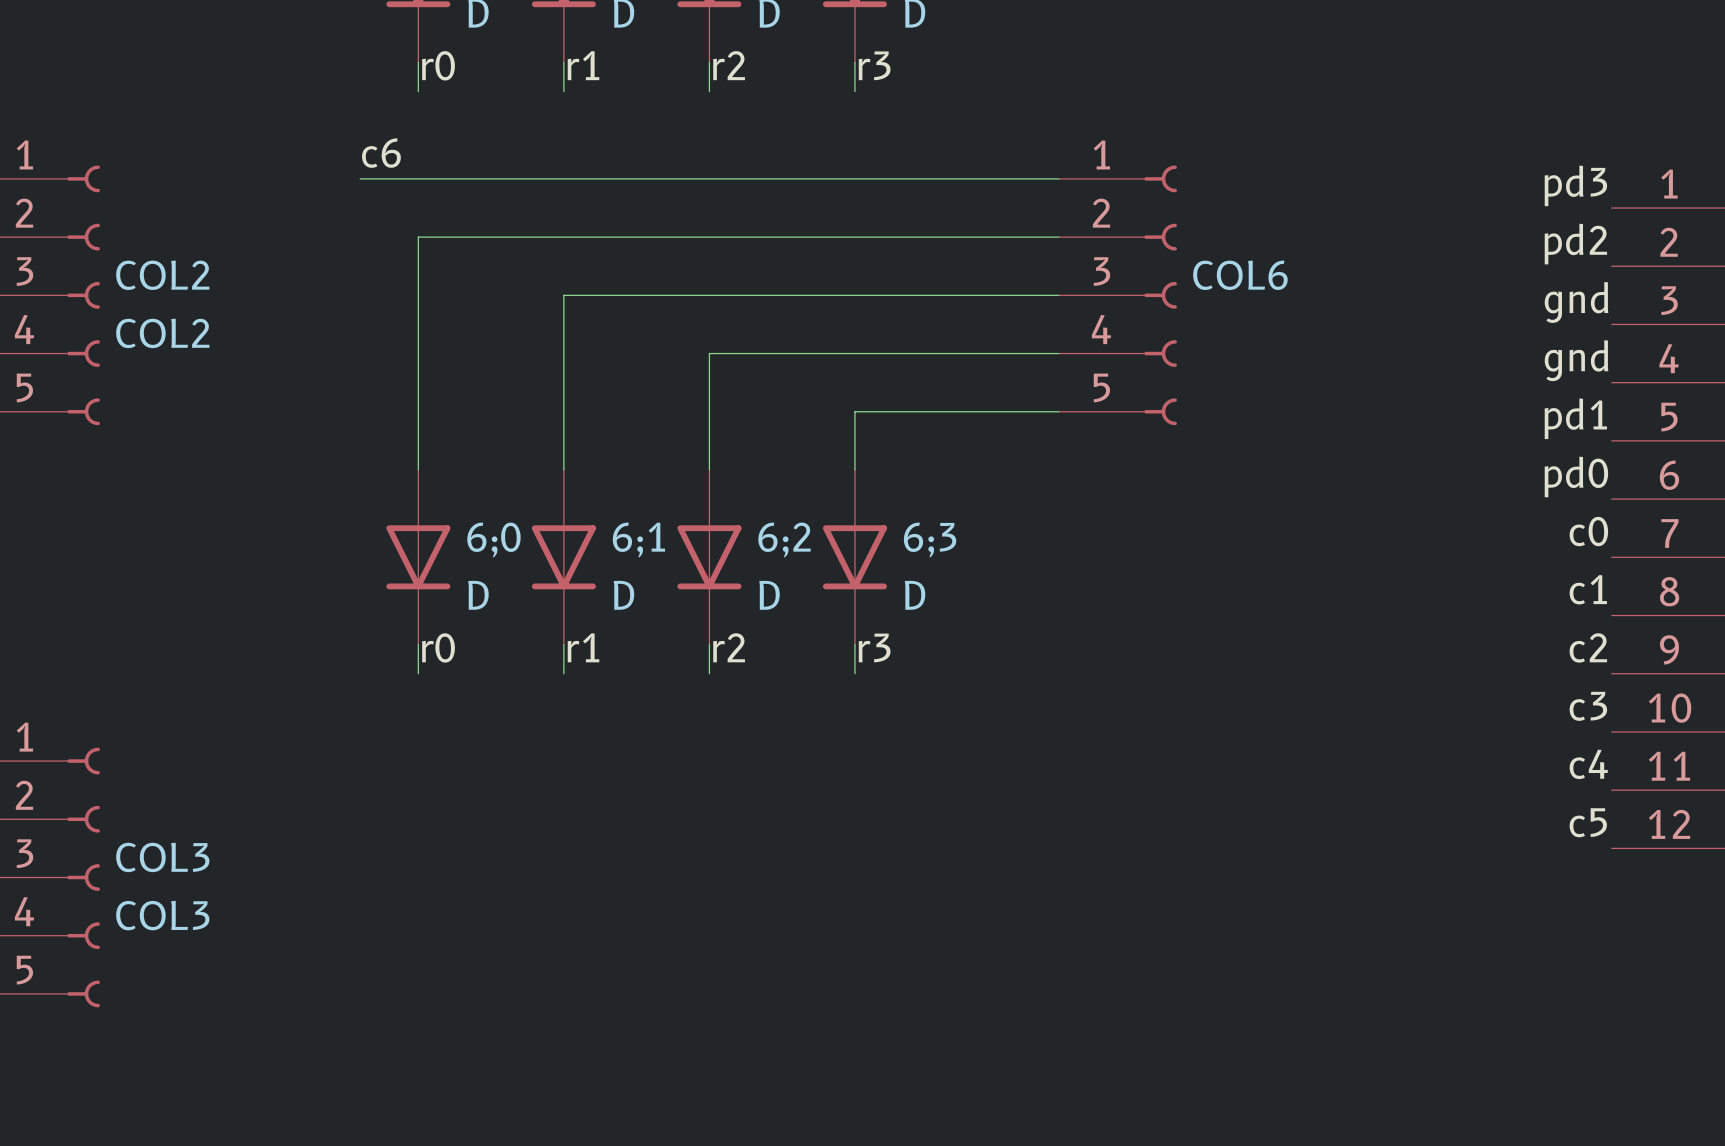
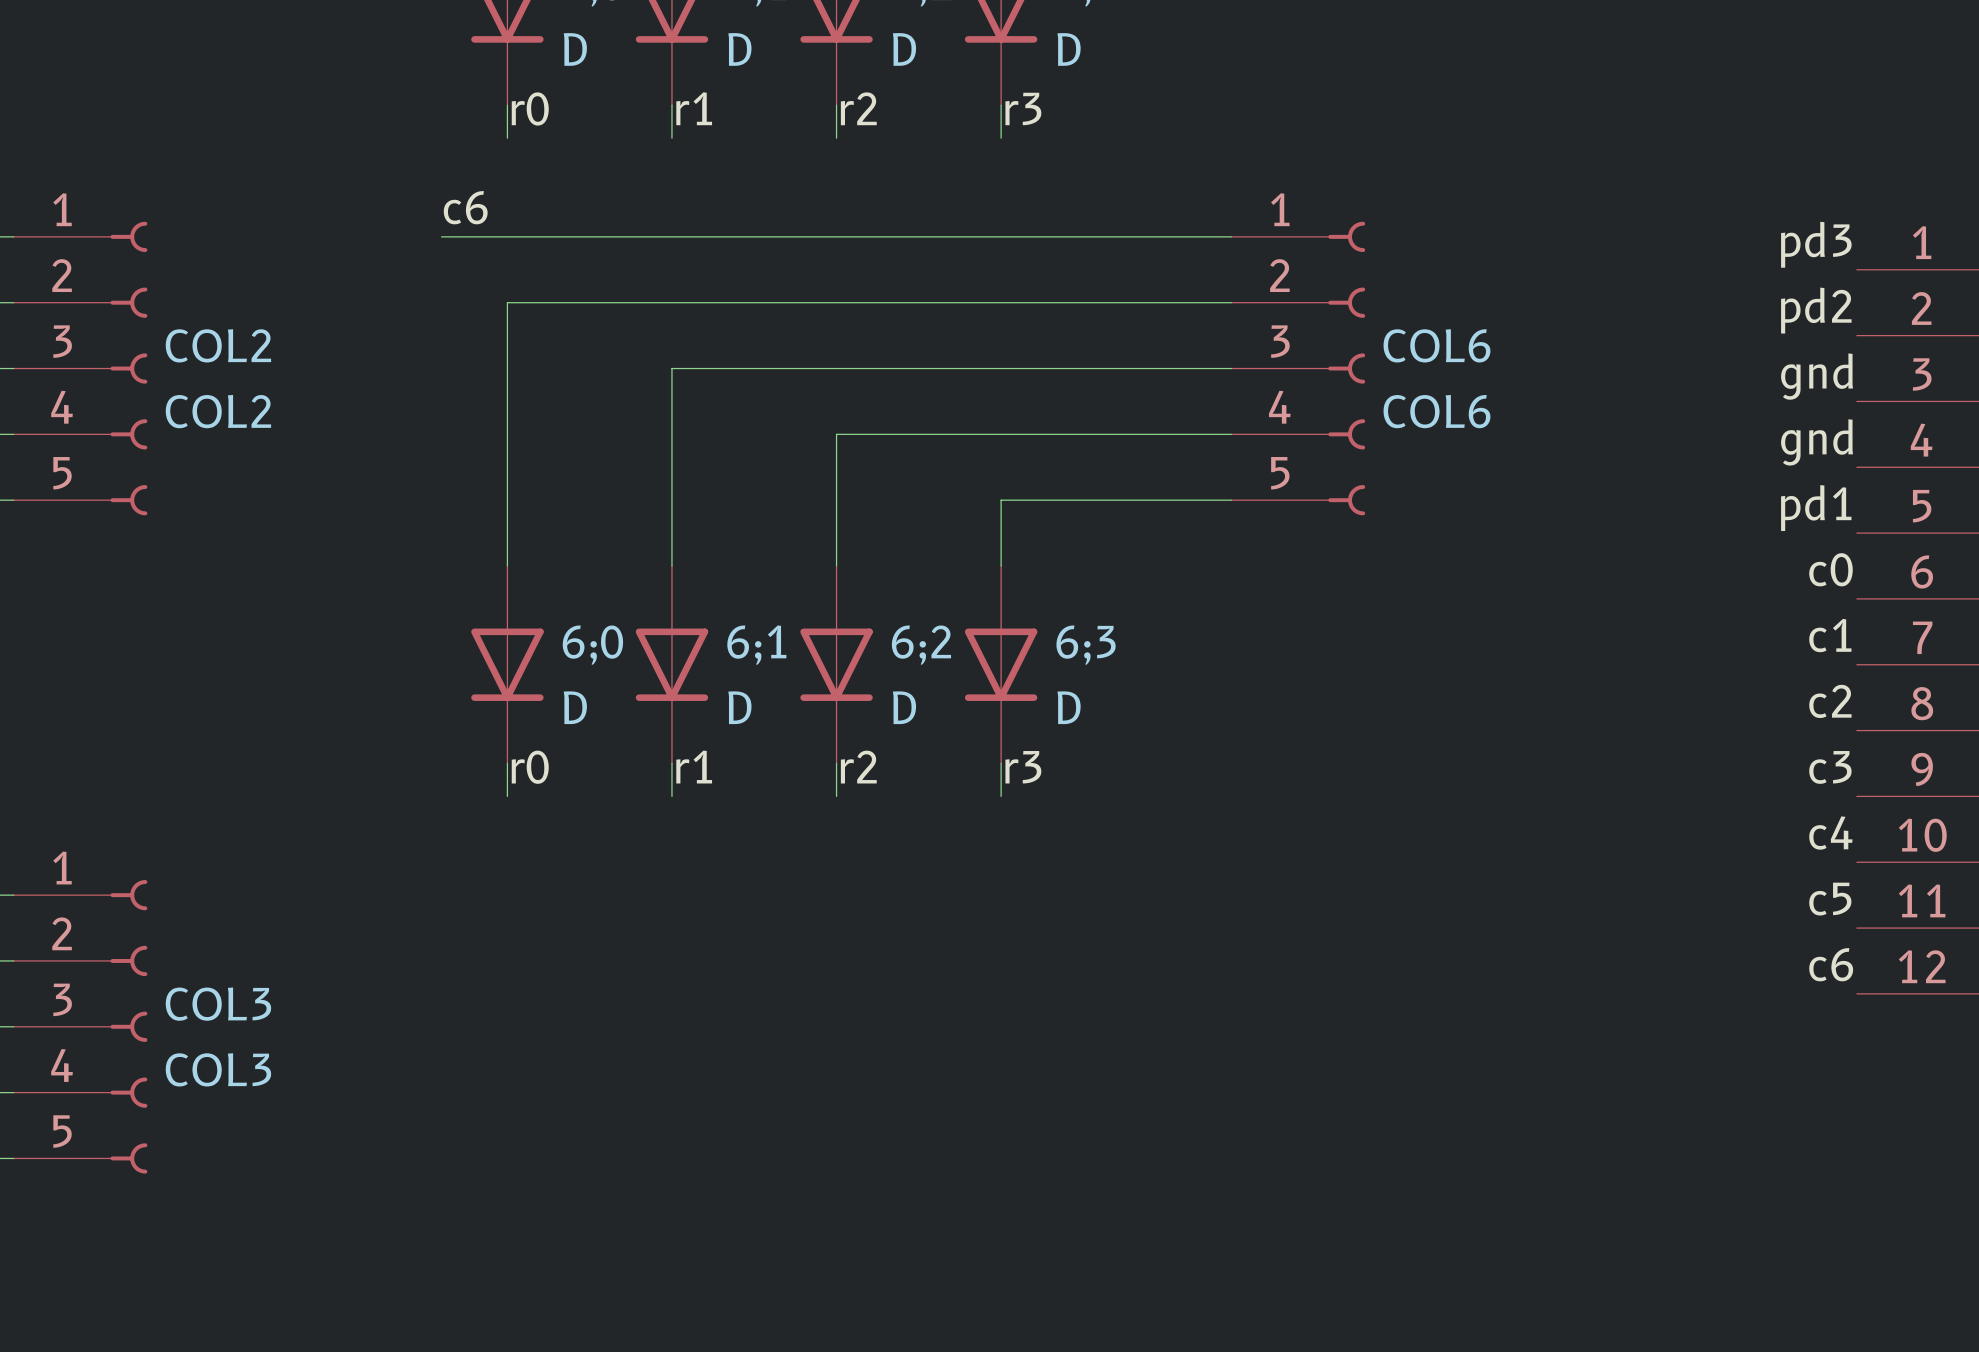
COL6 value: none -> COL6 (1436, 411)
label: pd0 (1576, 476) -> c0 (1830, 569)
label: c0 (1588, 531) -> c1 (1830, 635)
label: c1 (1588, 589) -> c2 (1830, 701)
label: c2 (1588, 647) -> c3 (1830, 767)
label: c3 (1588, 706) -> c4 (1830, 833)
label: c4 (1588, 764) -> c5 (1830, 899)
label: c5 (1588, 822) -> c6 (1831, 964)

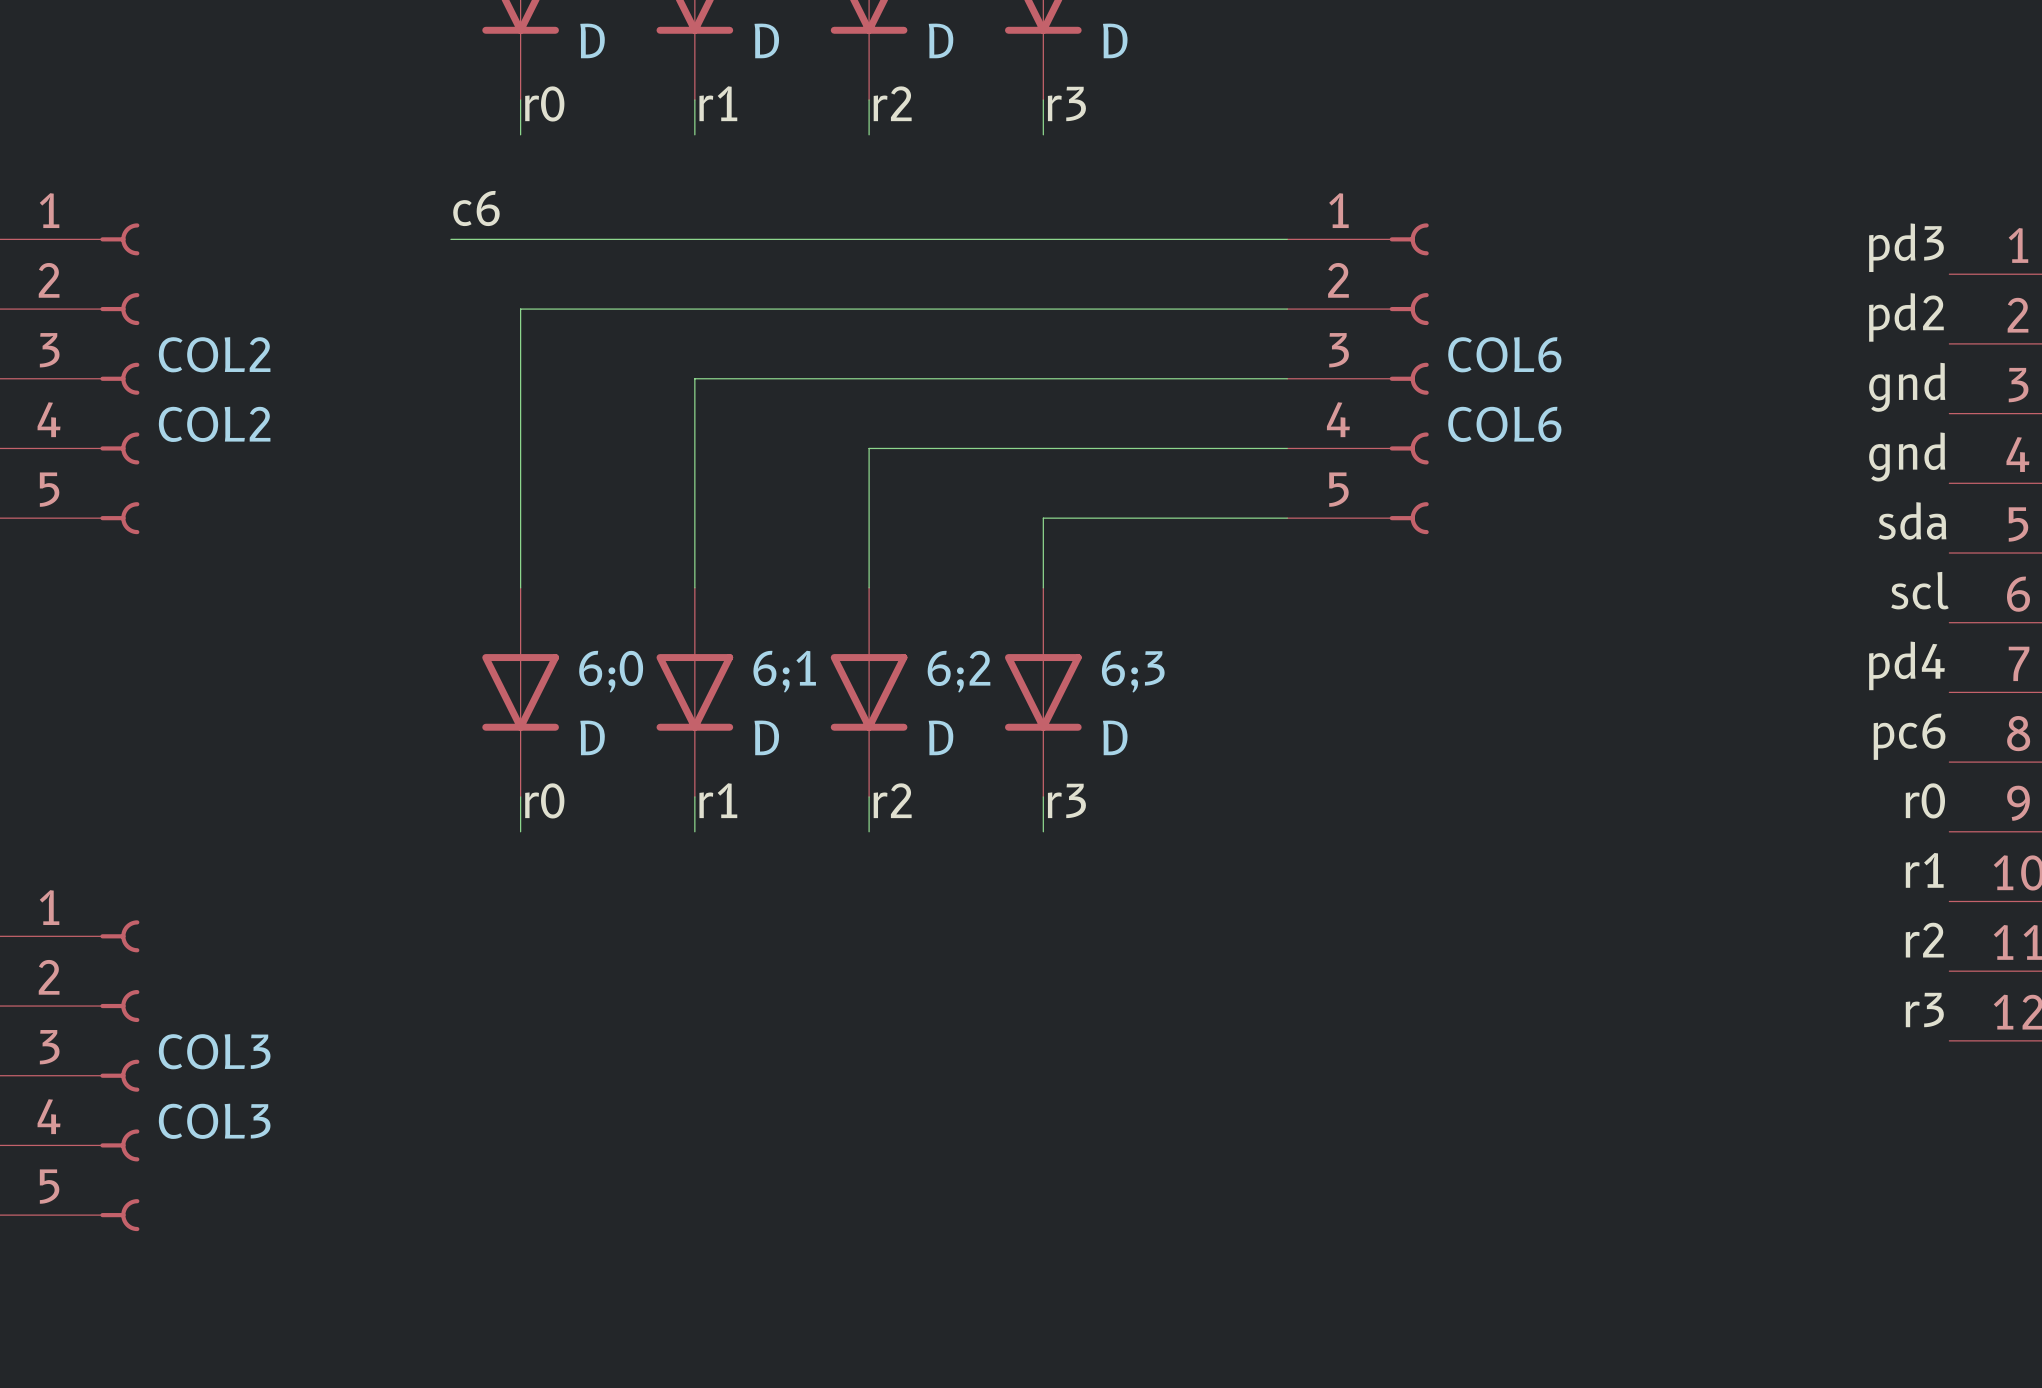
label: pd1 (1816, 508) -> sda (1912, 520)
label: c0 (1830, 569) -> scl (1919, 590)
label: c1 (1830, 635) -> pd4 (1906, 665)
label: c2 (1830, 701) -> pc6 (1909, 736)
label: c3 (1830, 767) -> r0 (1925, 800)
label: c4 (1830, 833) -> r1 (1924, 870)
label: c5 (1830, 899) -> r2 (1924, 940)
label: c6 (1831, 964) -> r3 (1924, 1010)

